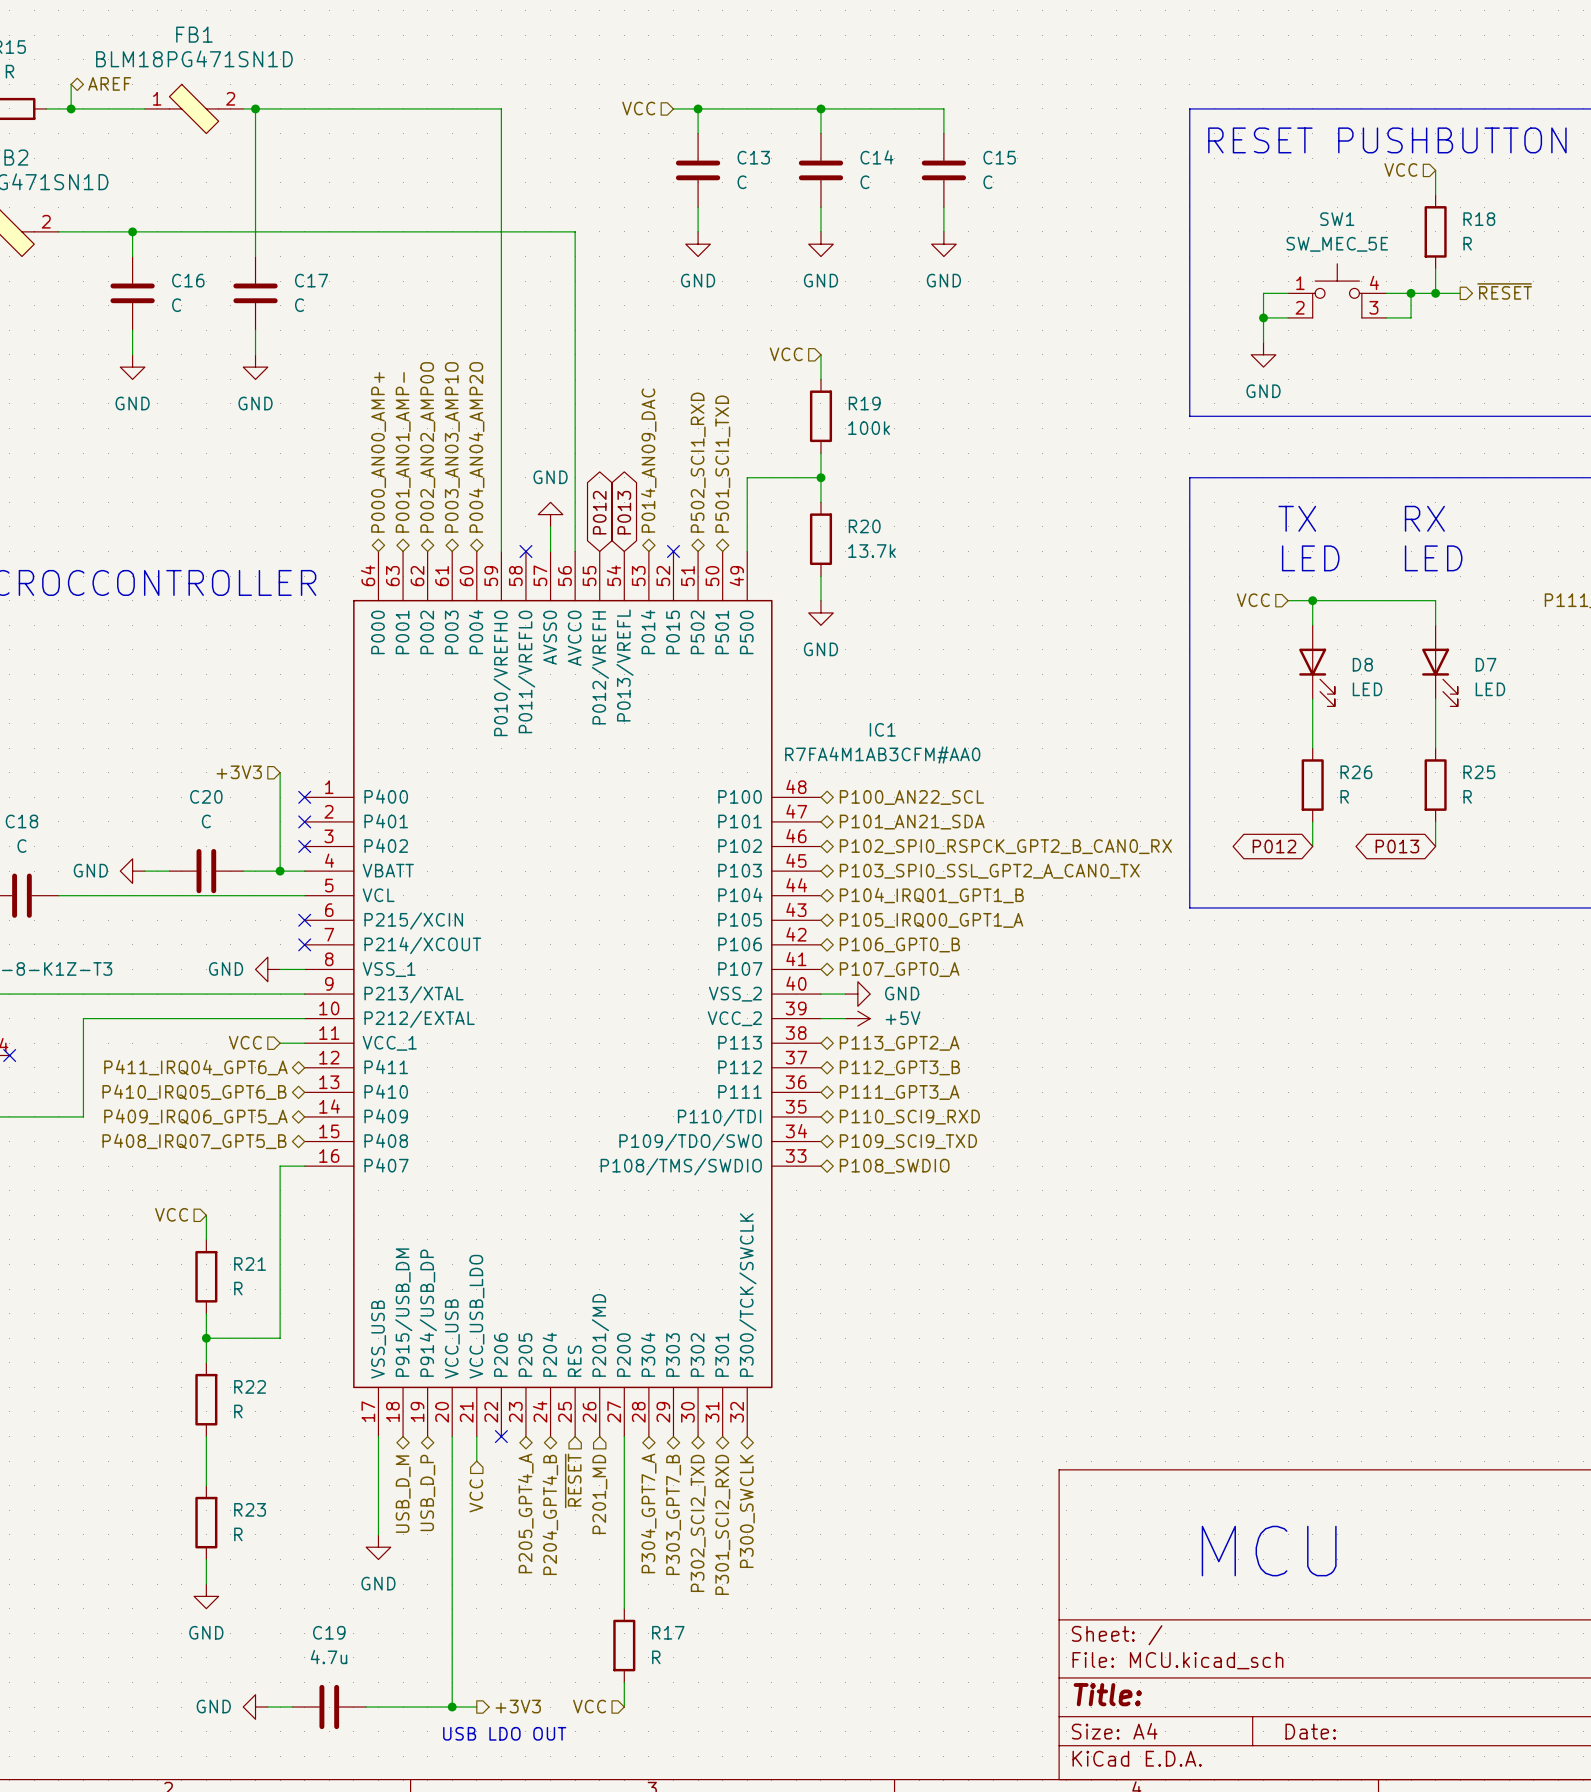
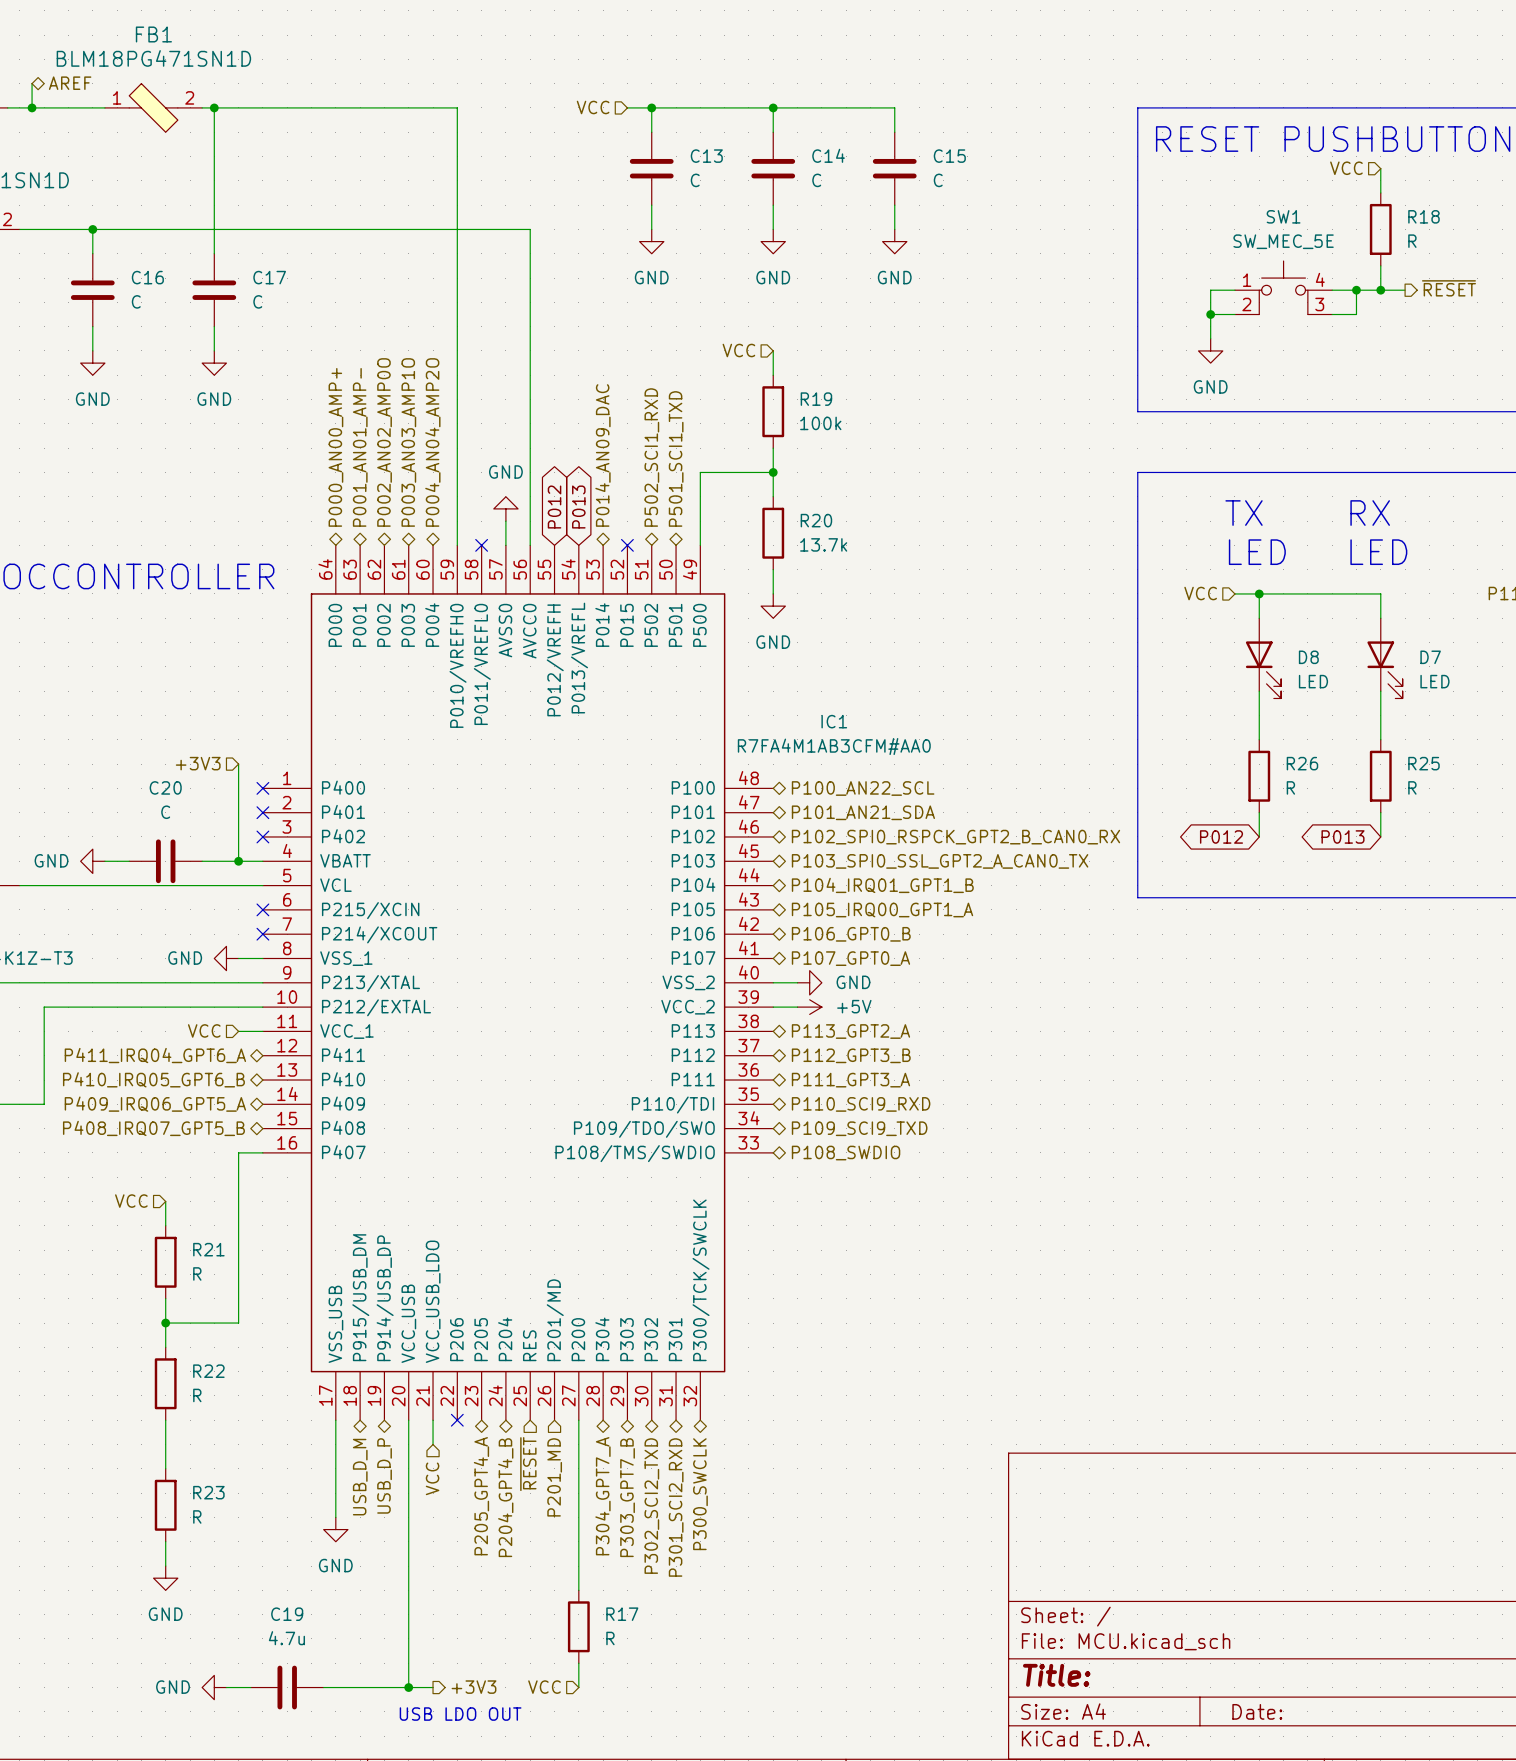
text: MCU (1269, 1551) -> none

